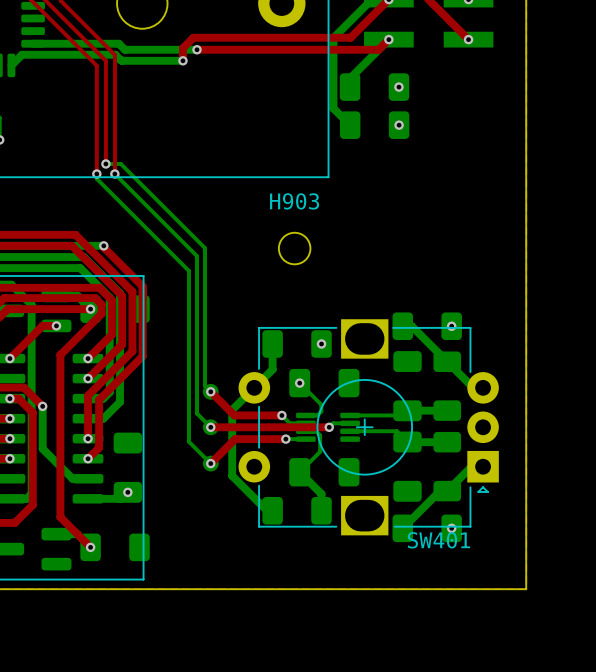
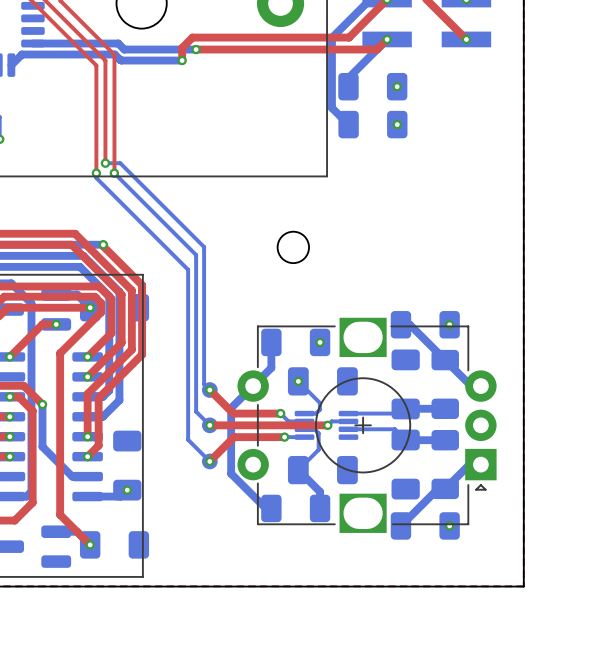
H903 name: H903 (294, 201) -> none
SW401 name: SW401 (438, 540) -> none

